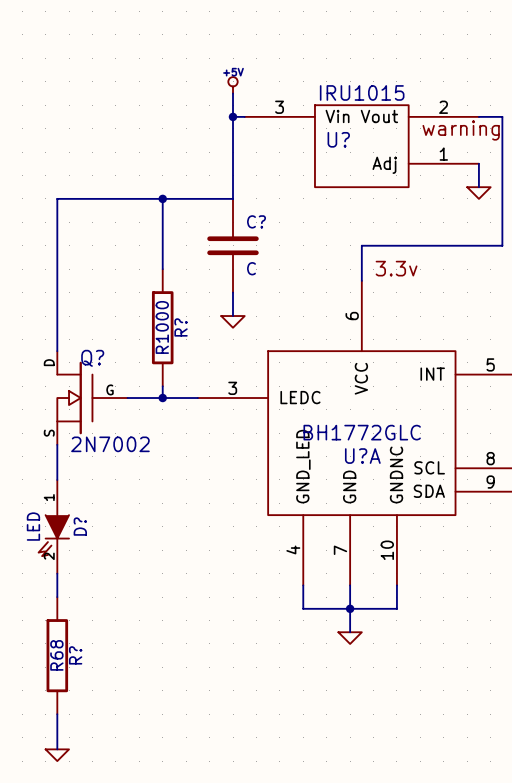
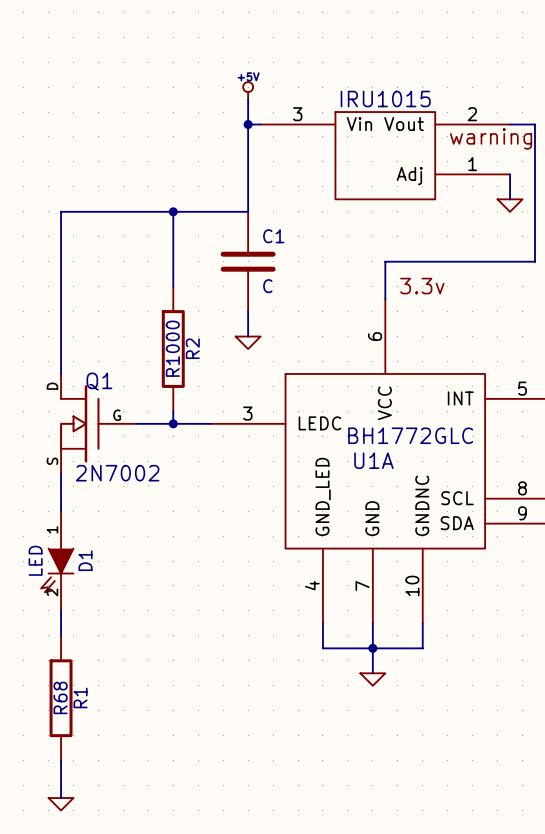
U? name: U? (338, 139) -> none
C? name: C? (256, 221) -> C1 (273, 236)
R? name: R? (181, 327) -> R2 (192, 348)
Q? name: Q? (92, 358) -> Q1 (99, 381)
U?A value position: BH1772GLC (362, 432) -> BH1772GLC (410, 435)
U?A name: U?A (362, 456) -> U1A (373, 460)
D? name: D? (80, 526) -> D1 (85, 560)
R? name: R? (75, 655) -> R1 (80, 697)

